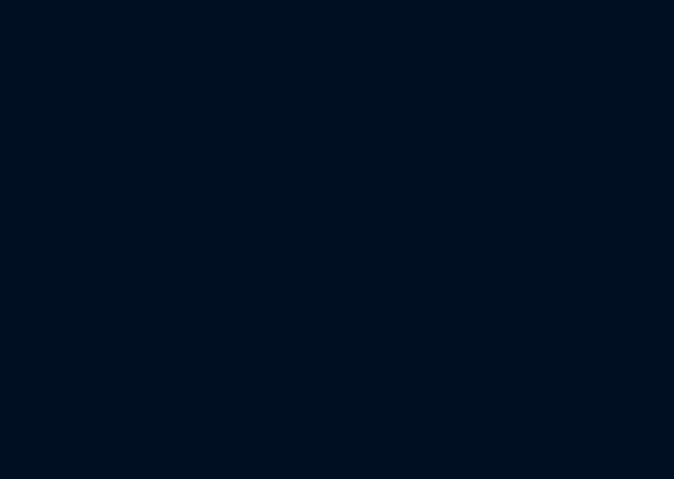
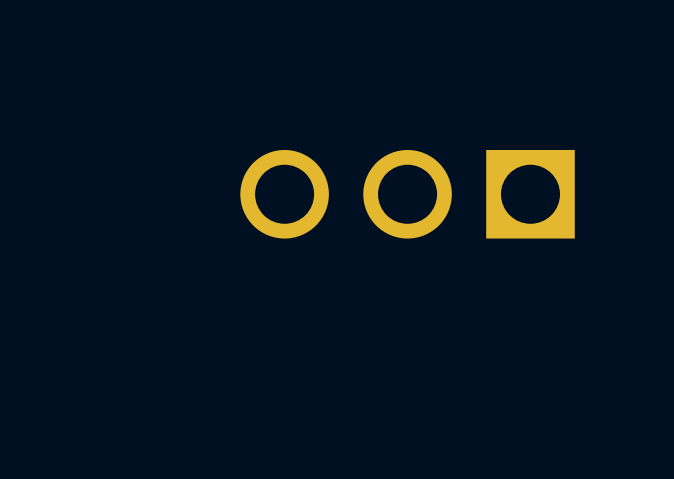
part: none -> (407, 194)

